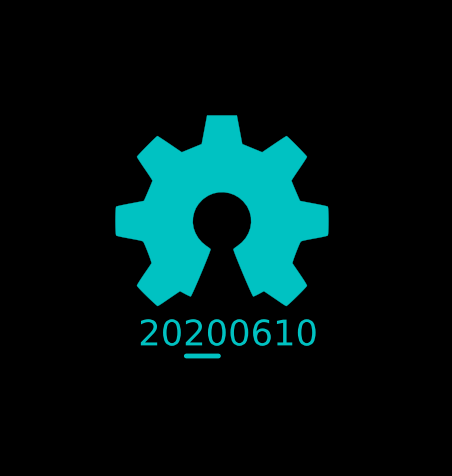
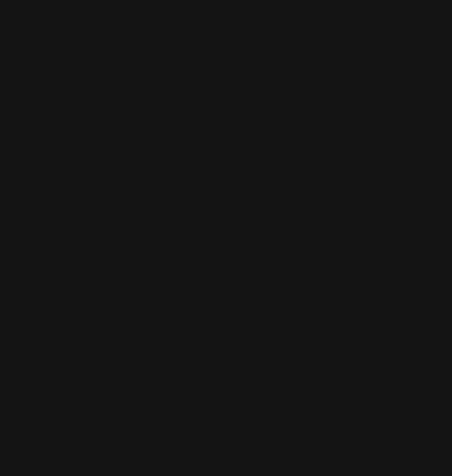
drawing: [115, 115, 329, 359] -> none

